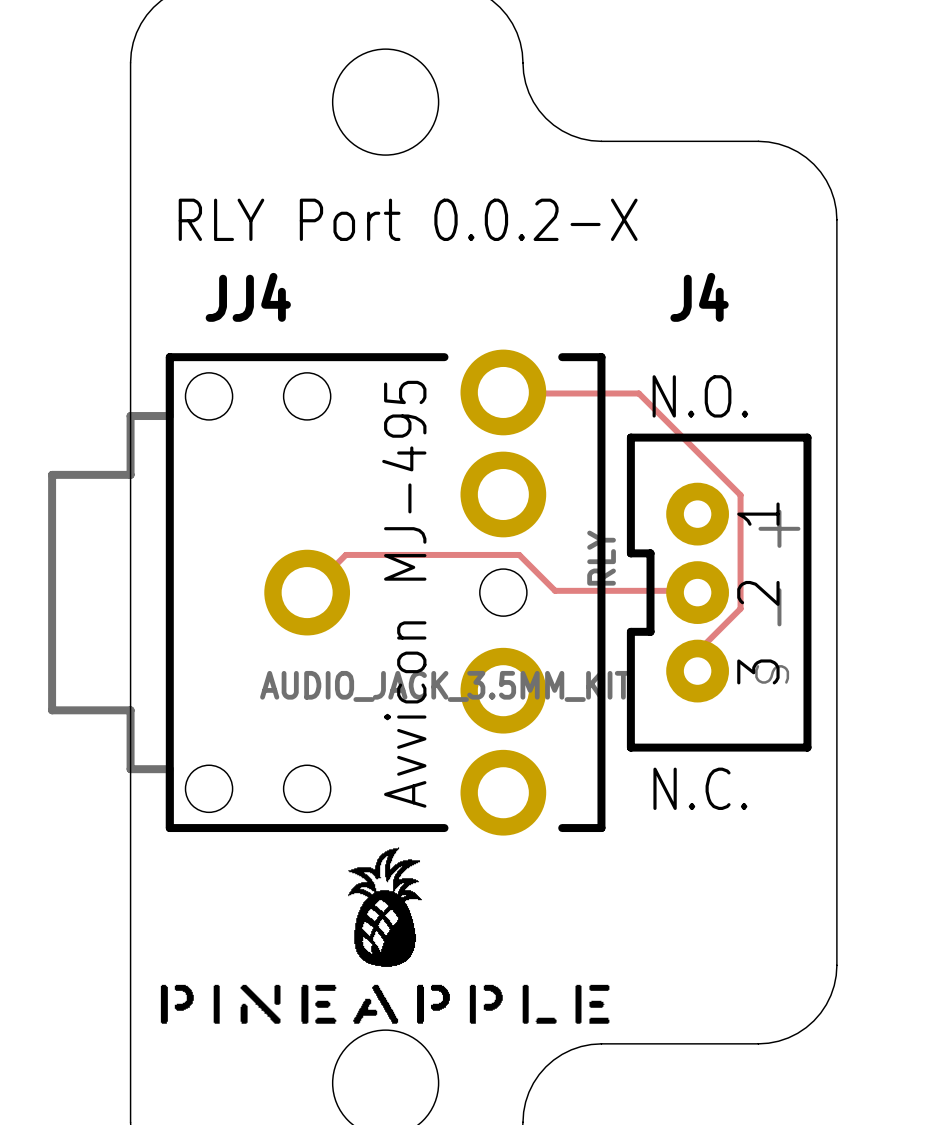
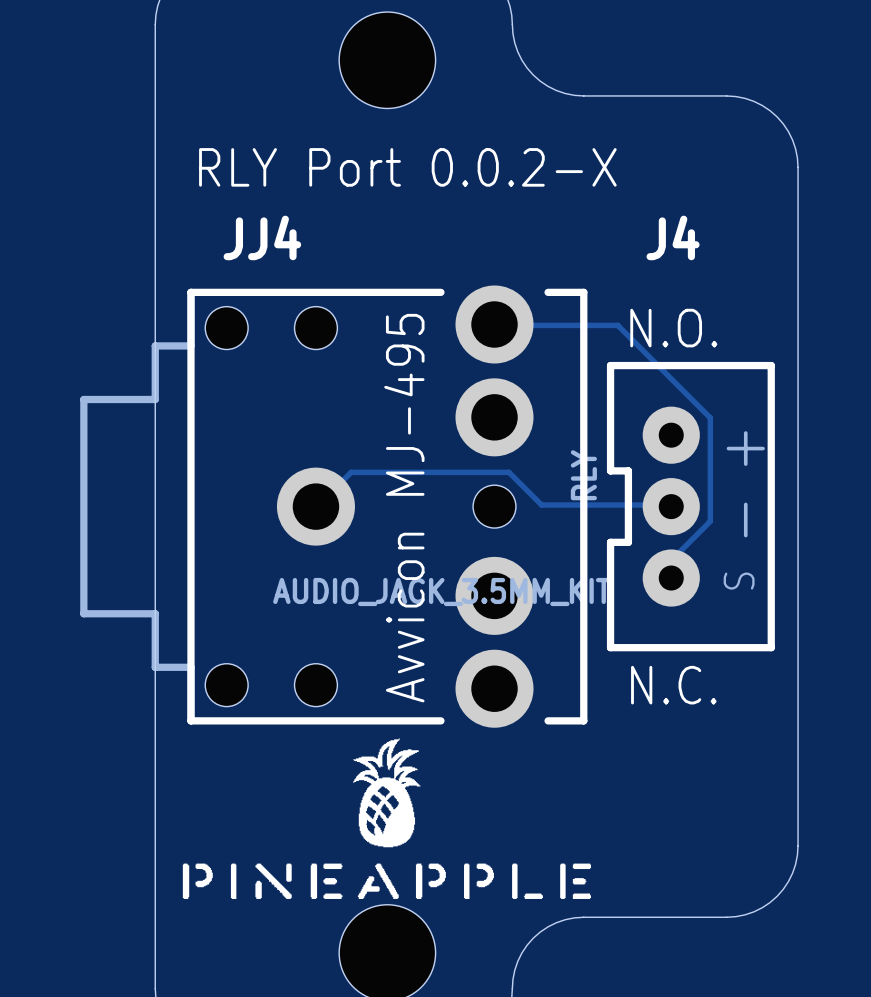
text: 1 (758, 514) -> none
text: 2 (758, 593) -> none
text: 3 (758, 671) -> none

